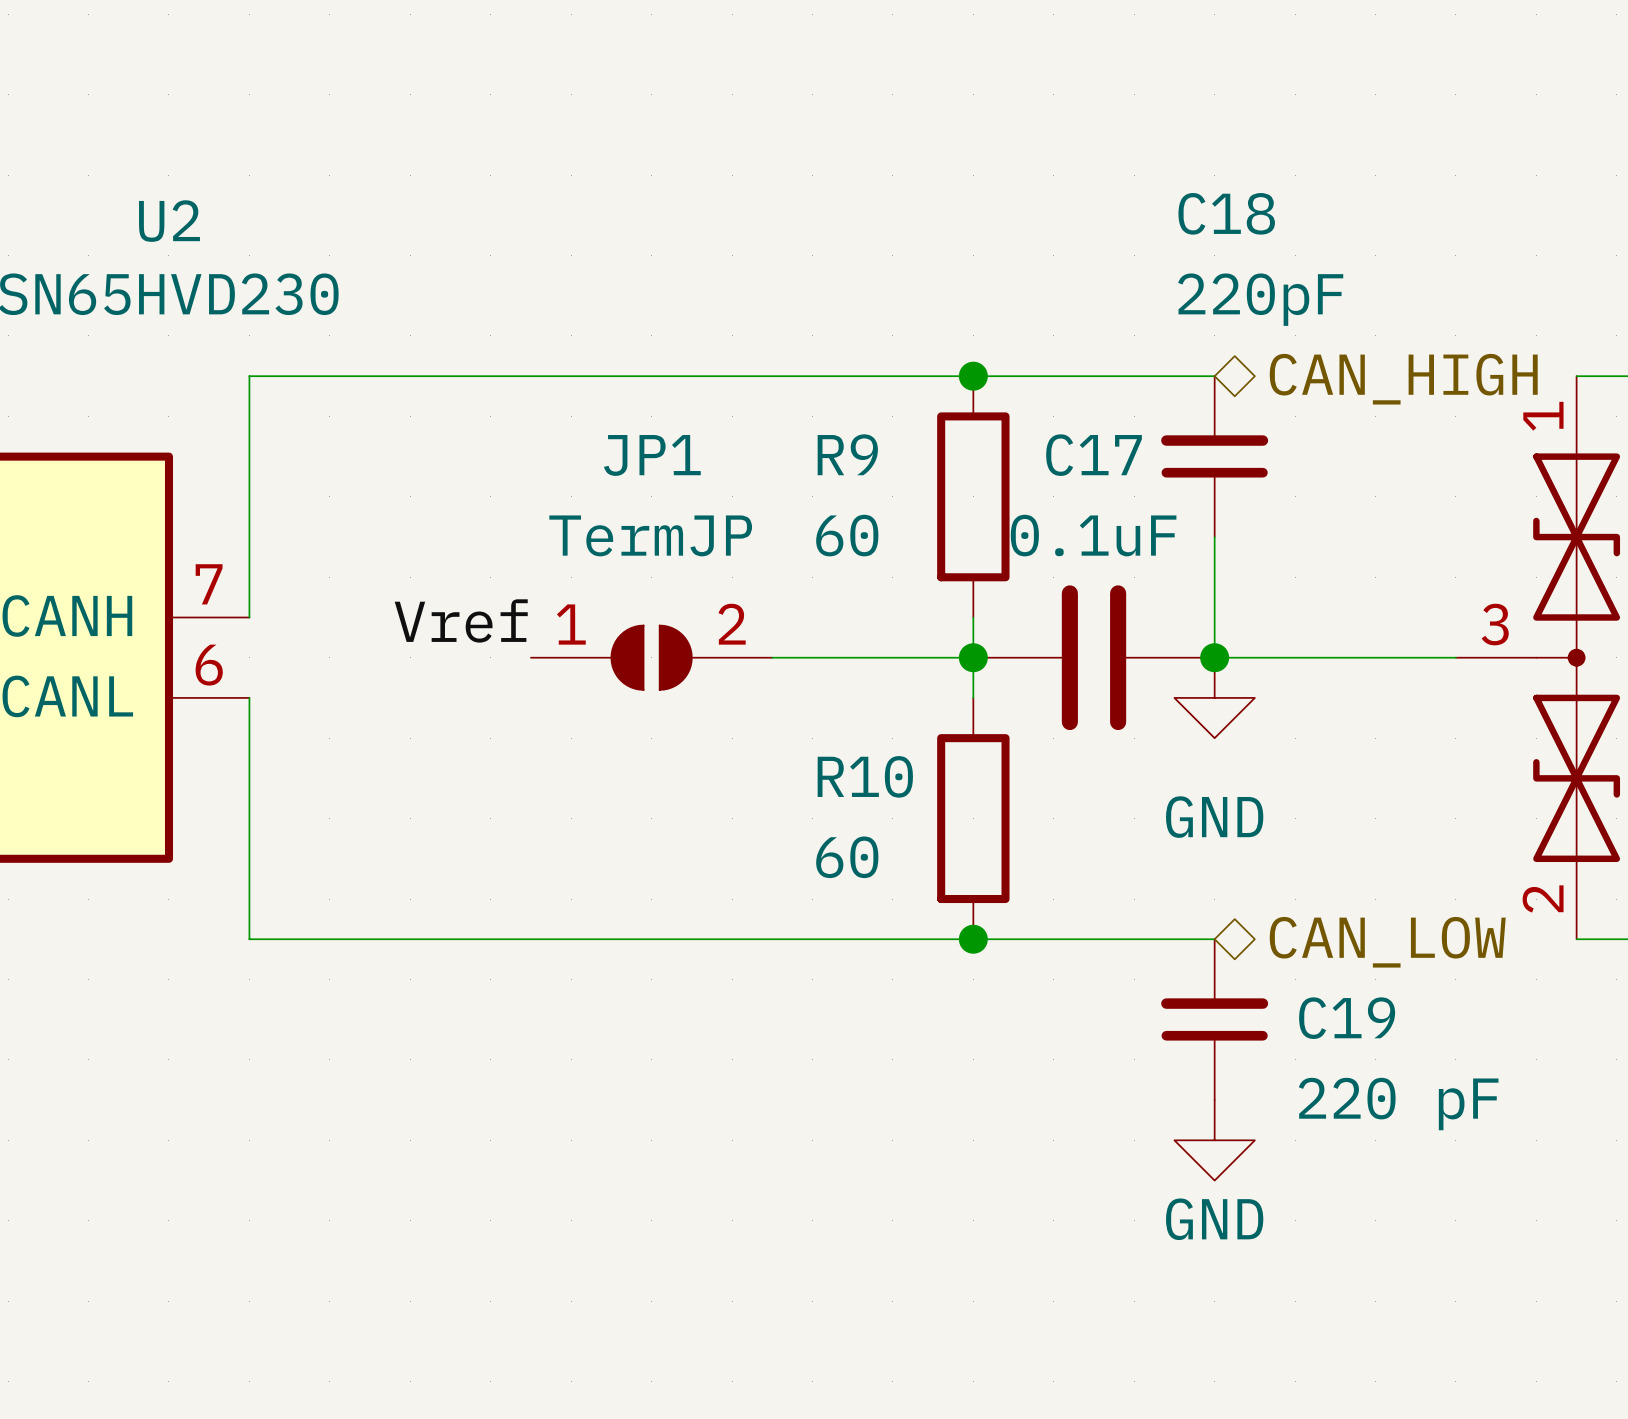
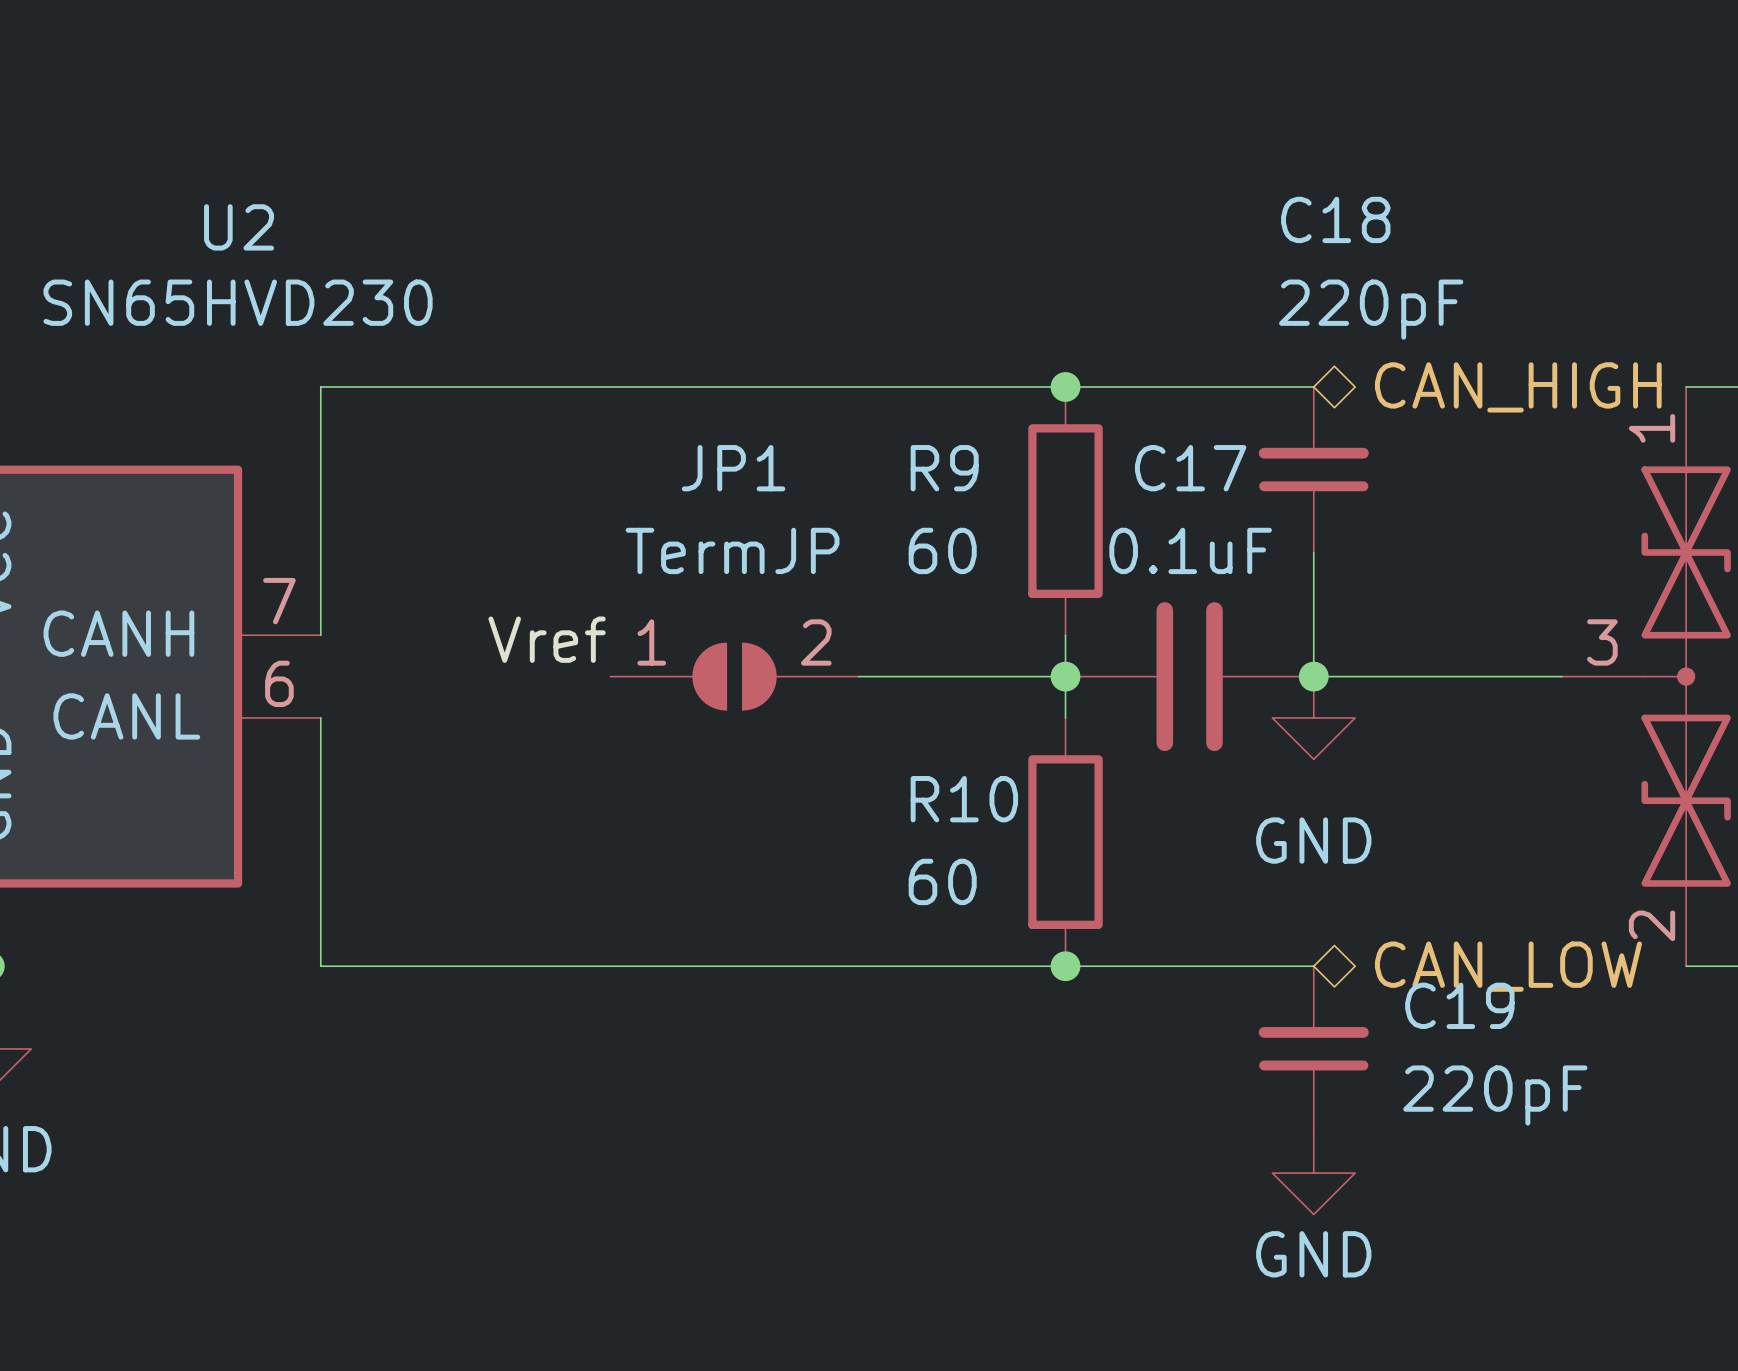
C19 name position: C19 (1347, 1018) -> C19 (1459, 1005)
C19 value: 220 pF (1398, 1104) -> 220pF (1495, 1095)

